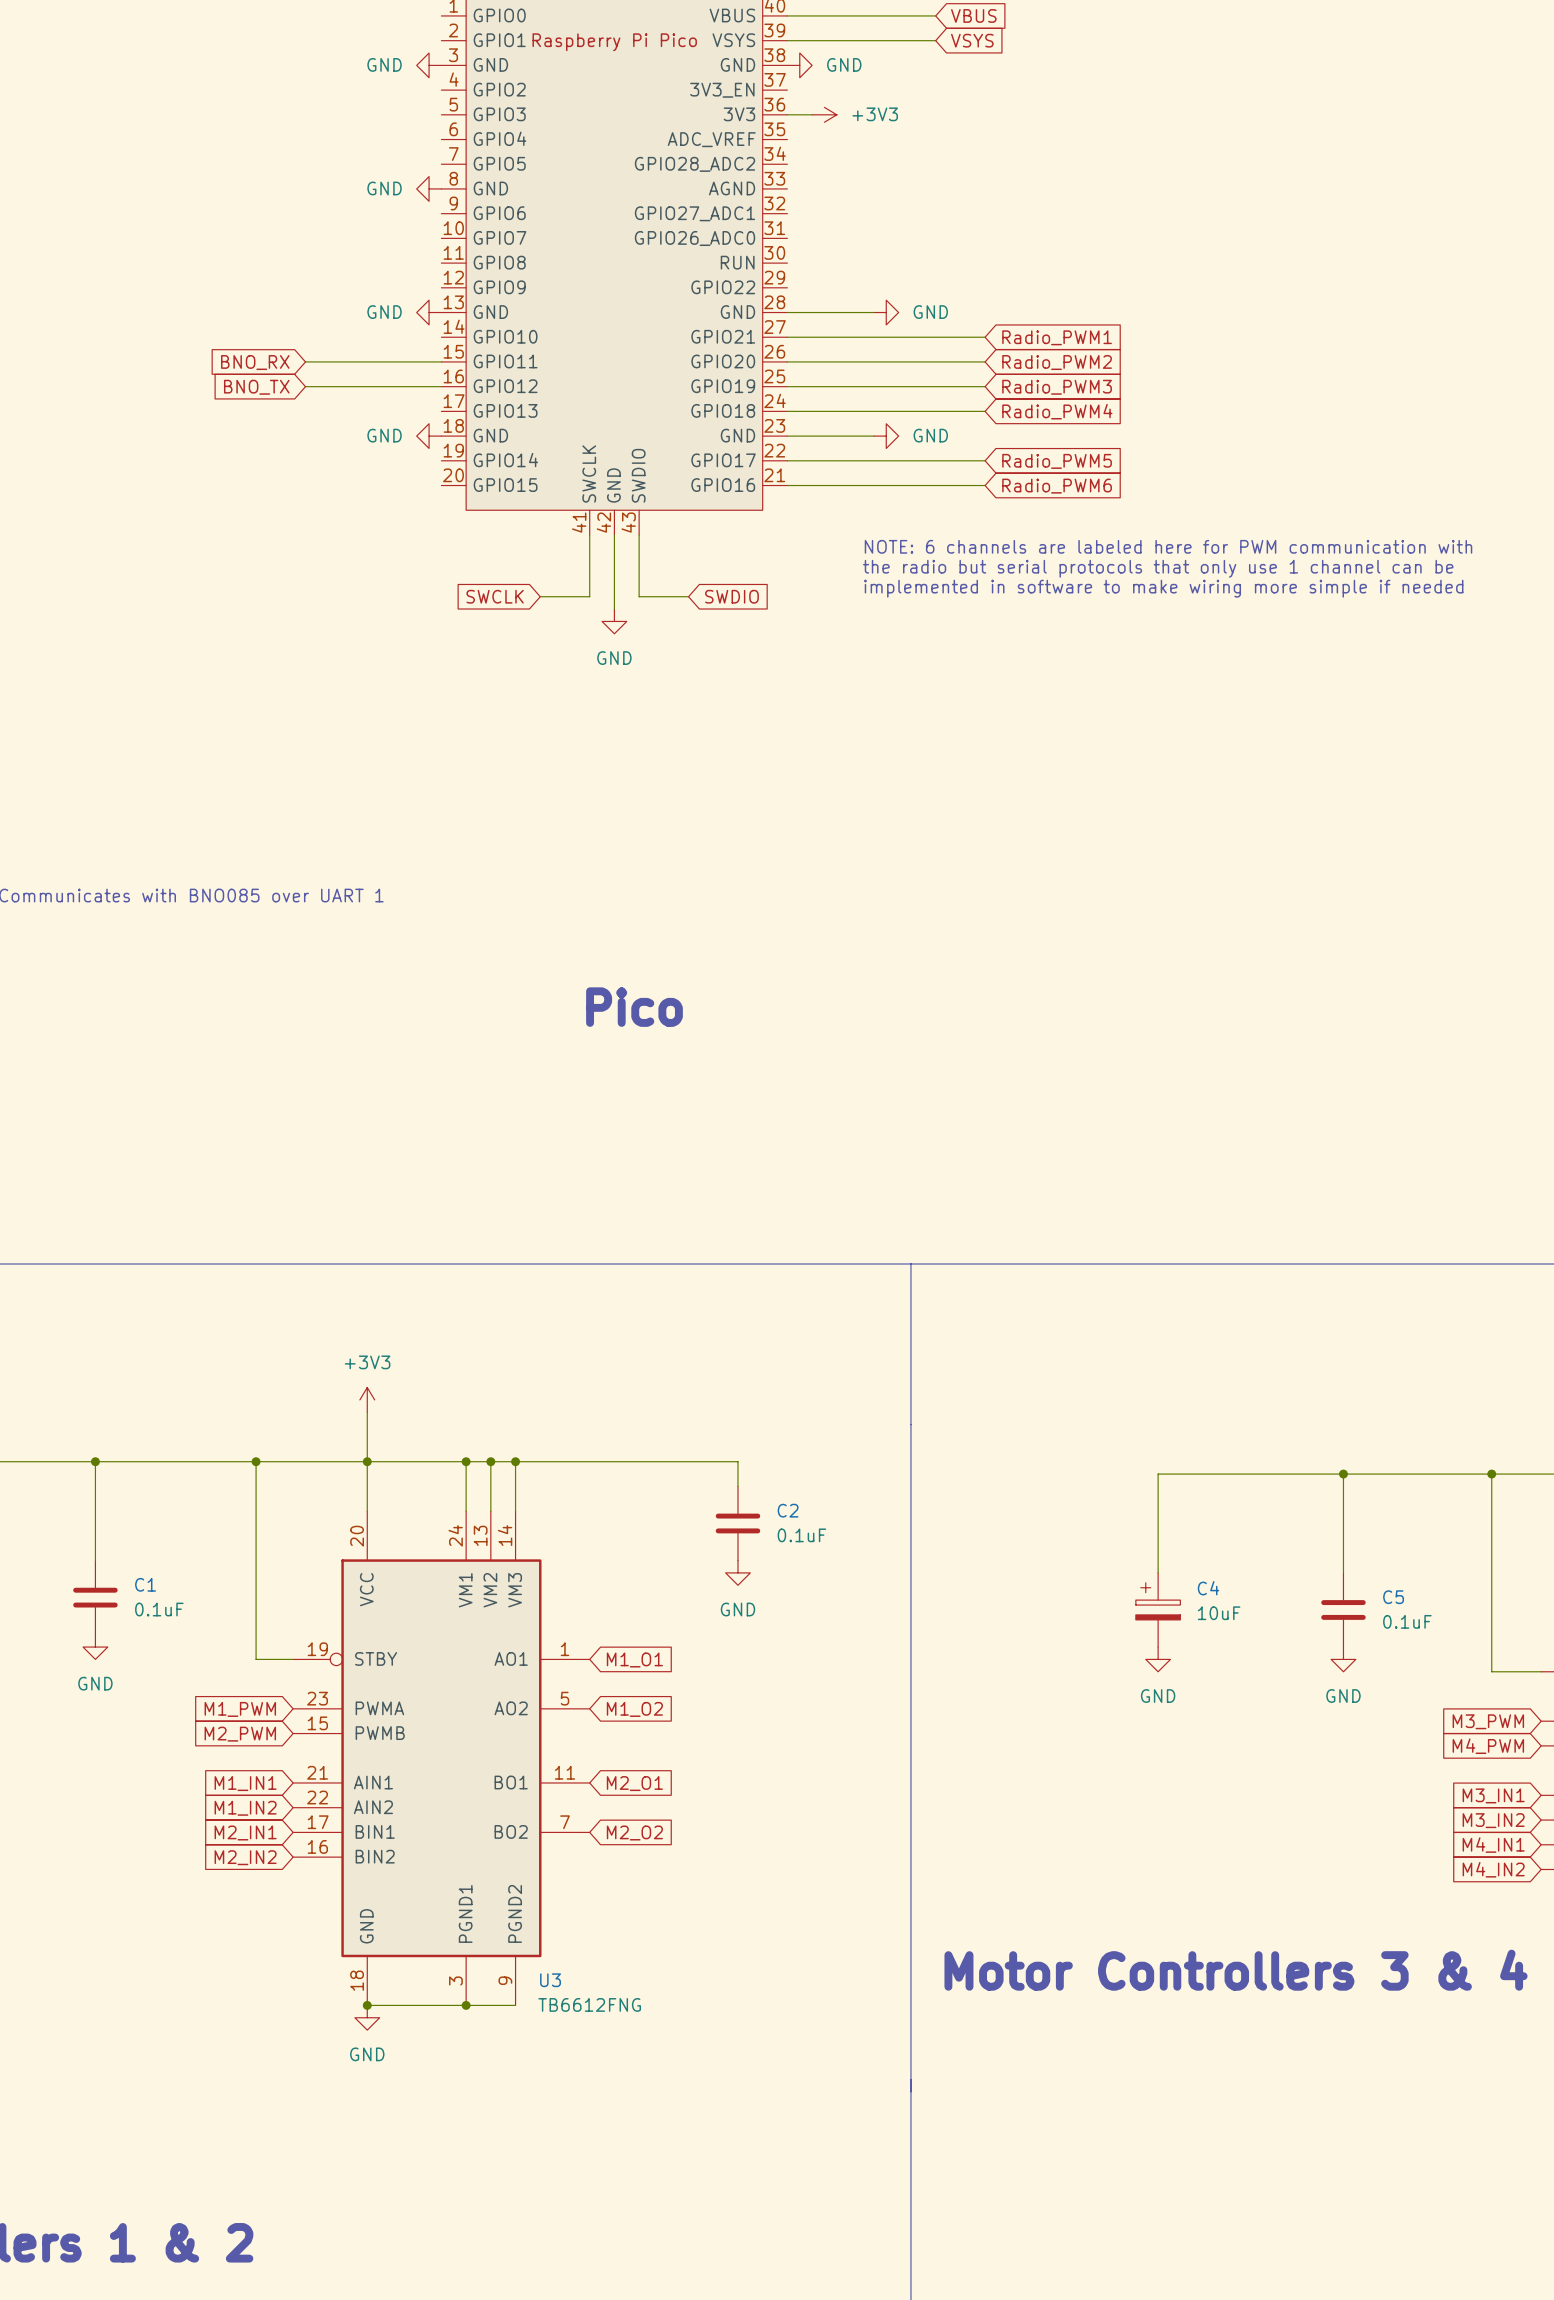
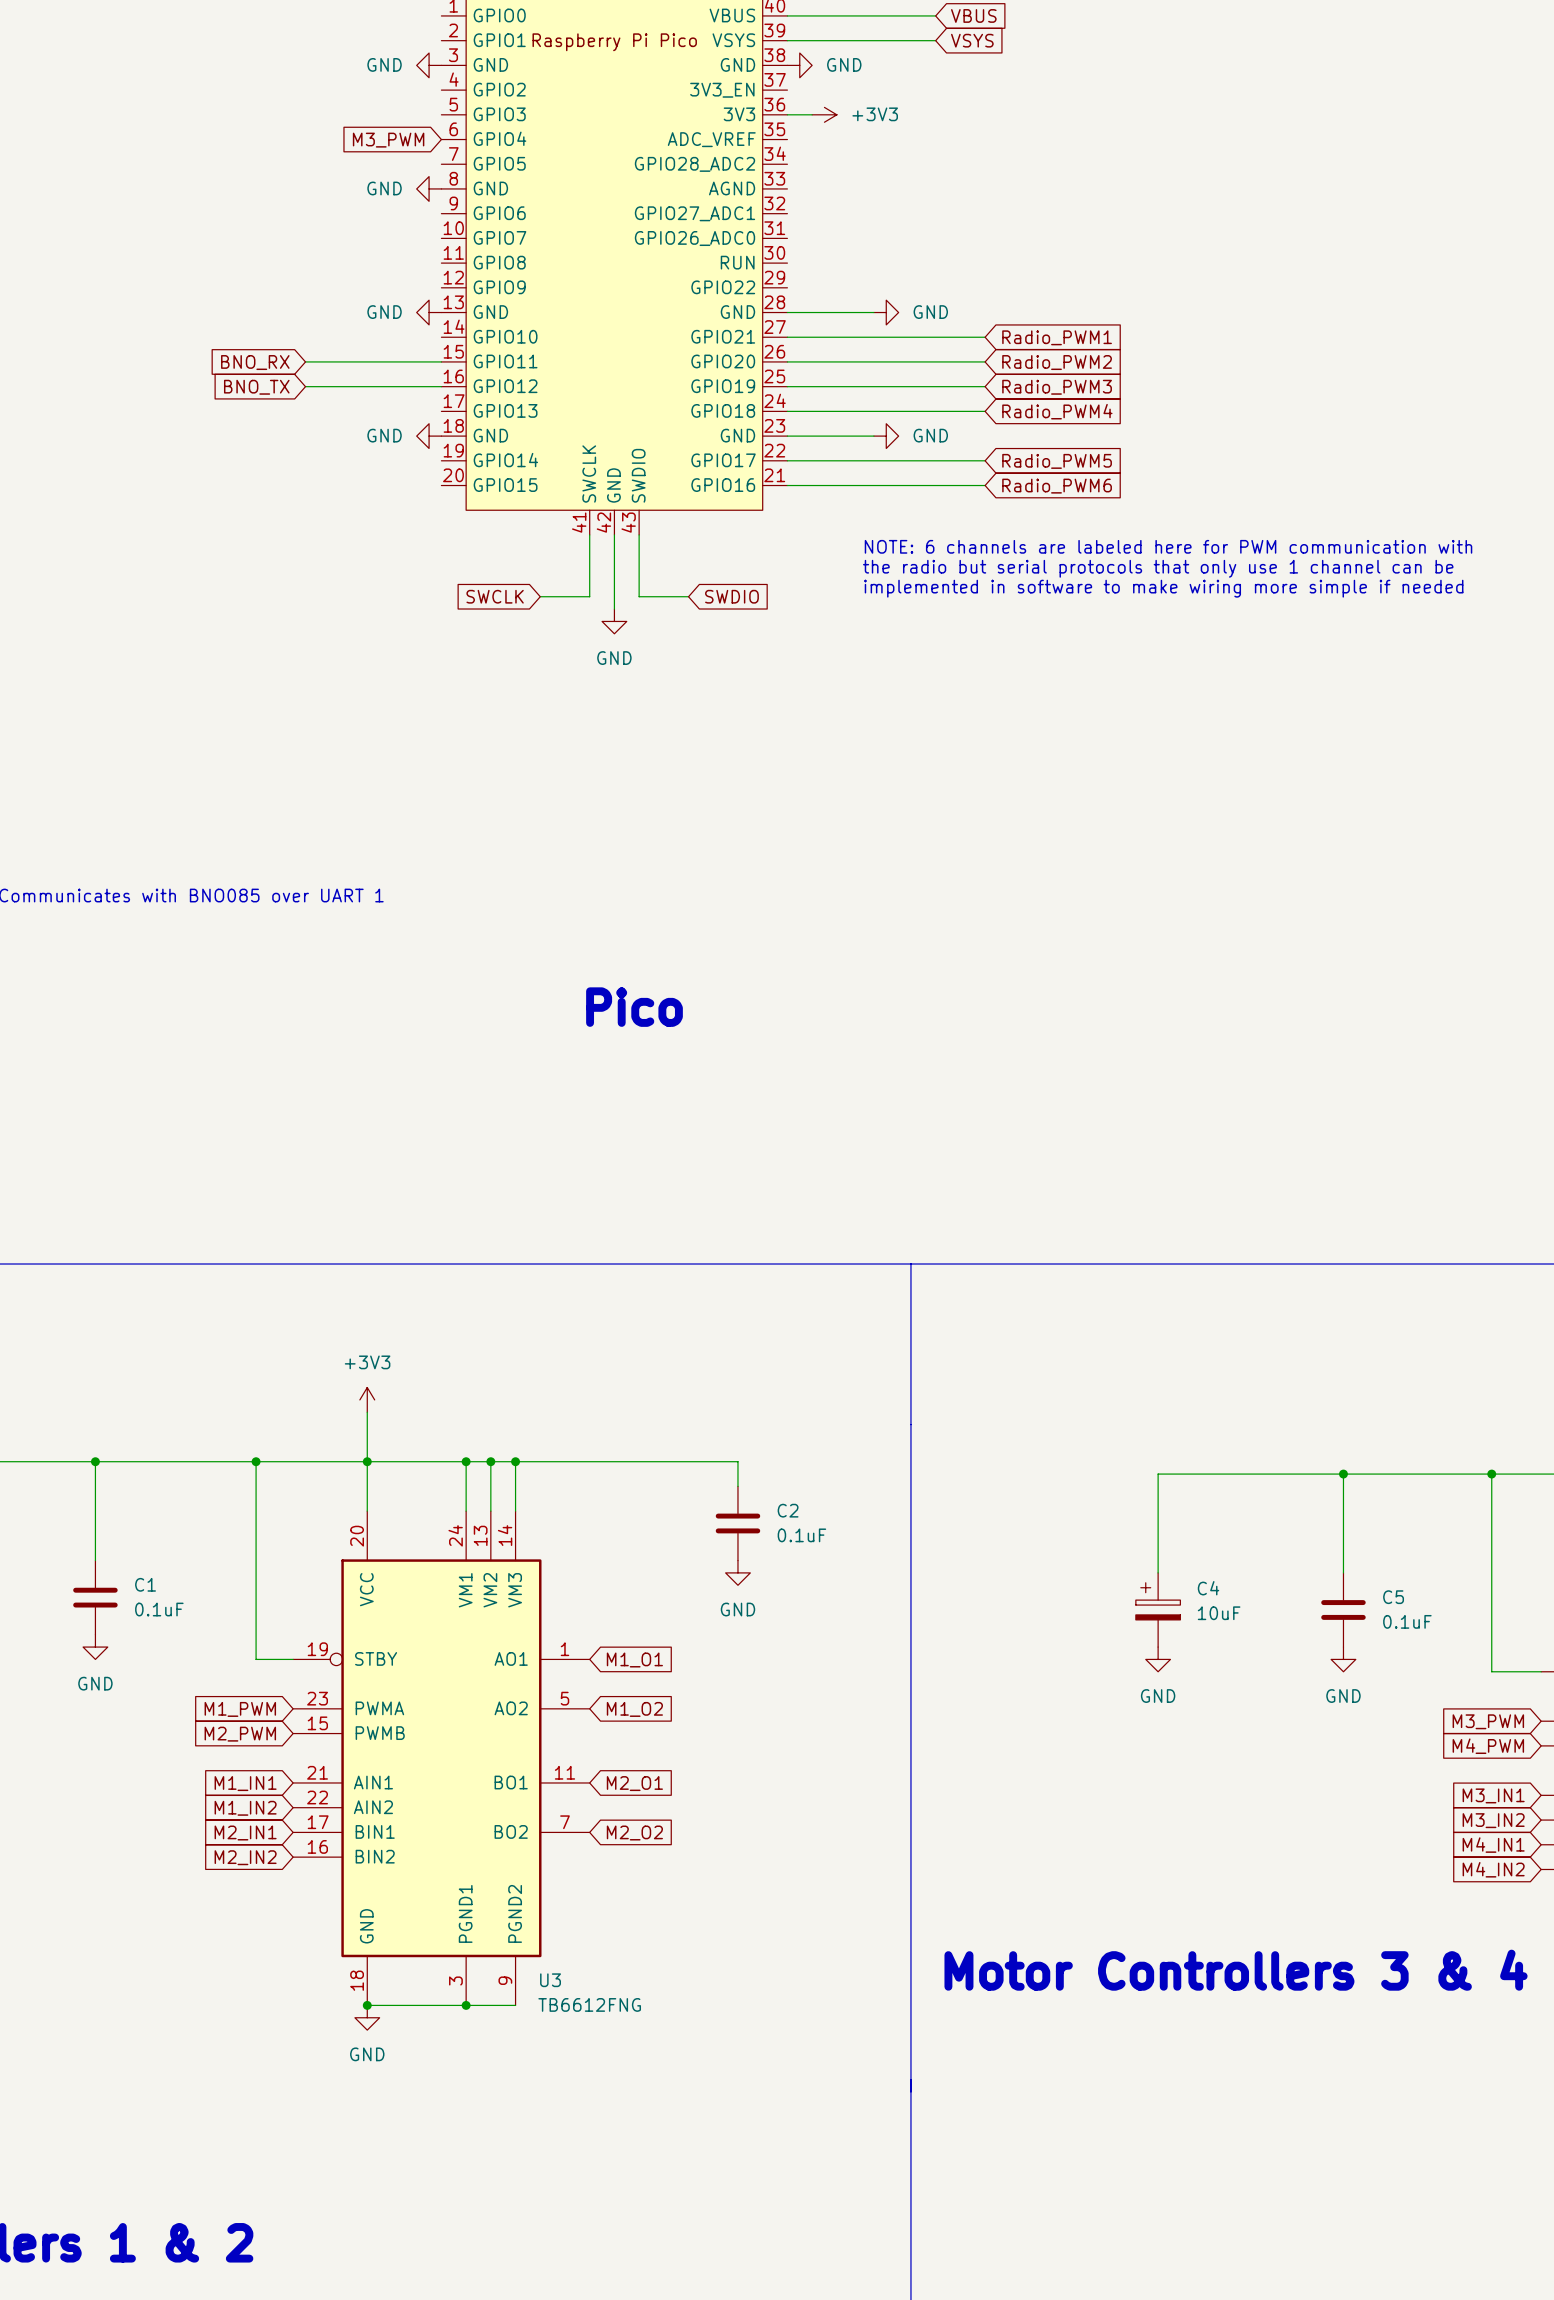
global label: none -> M3_PWM (388, 140)

